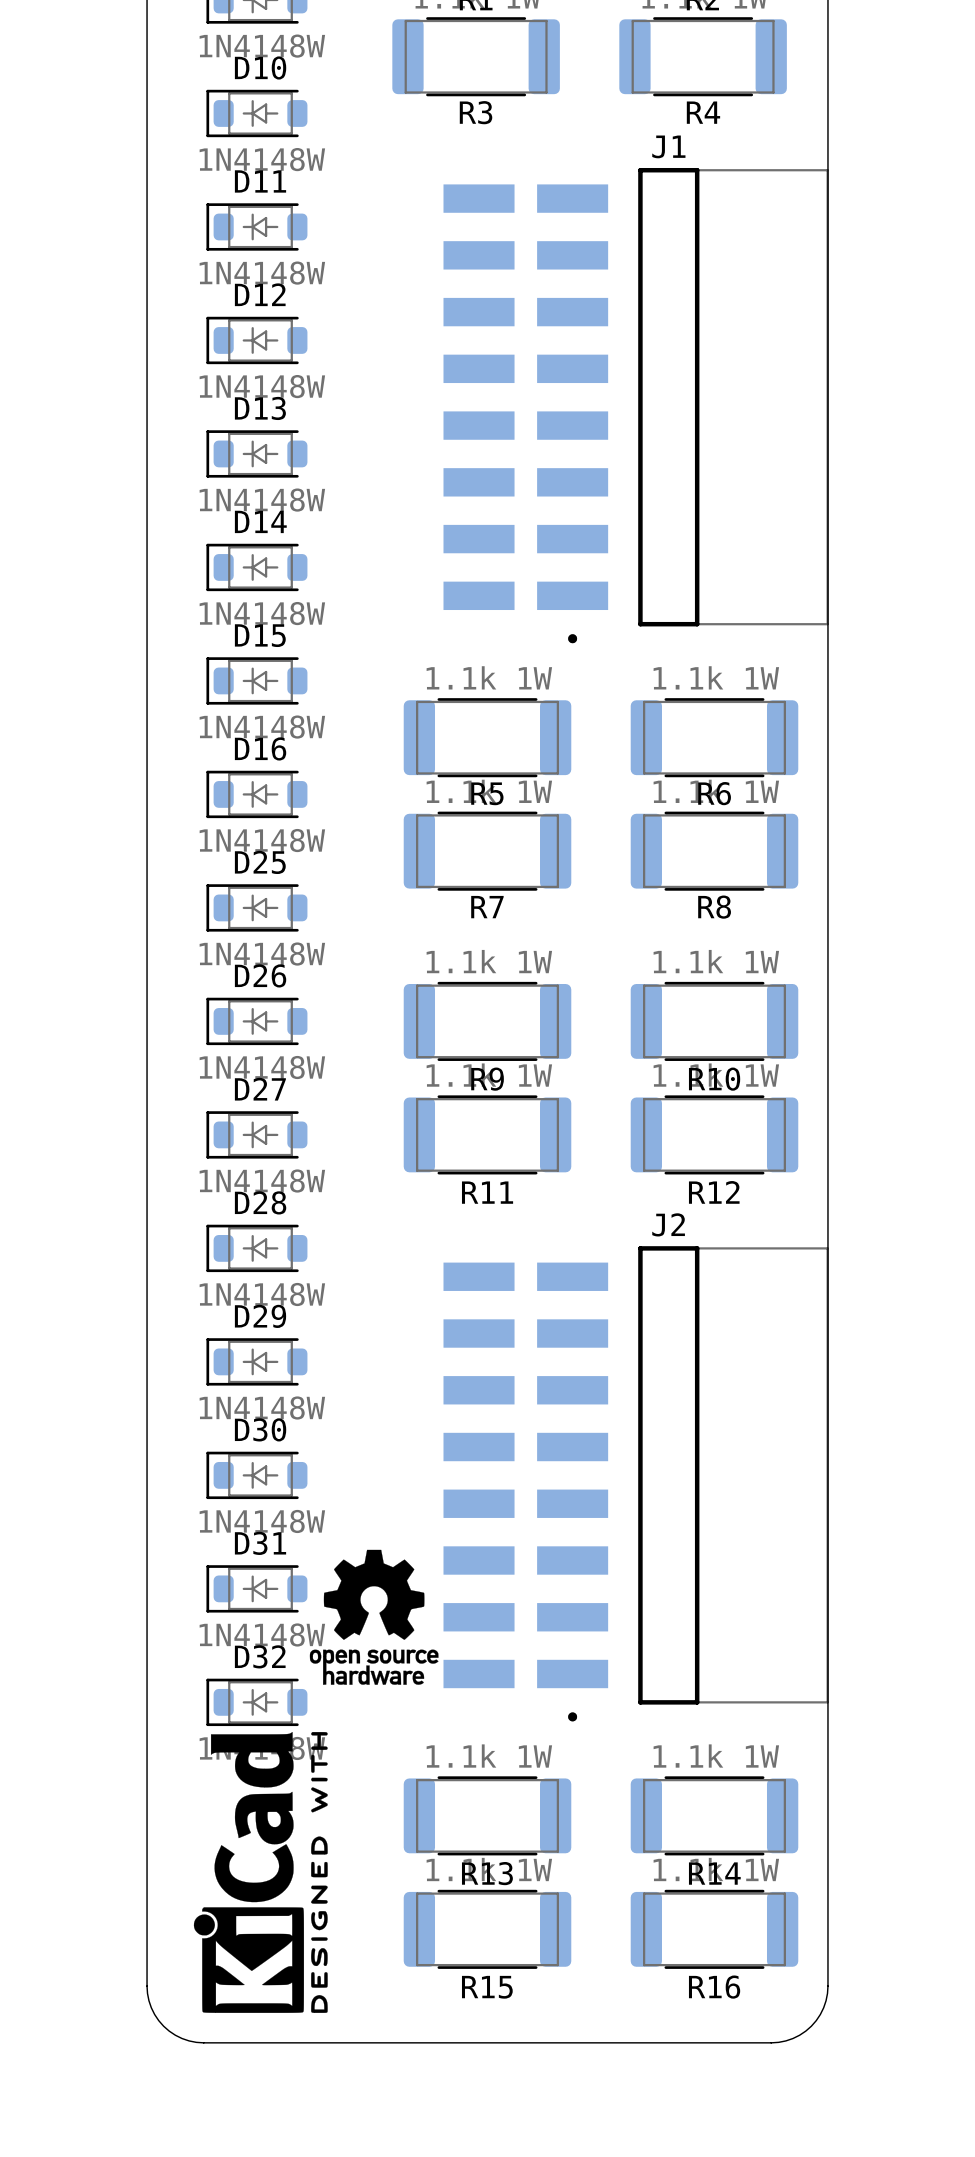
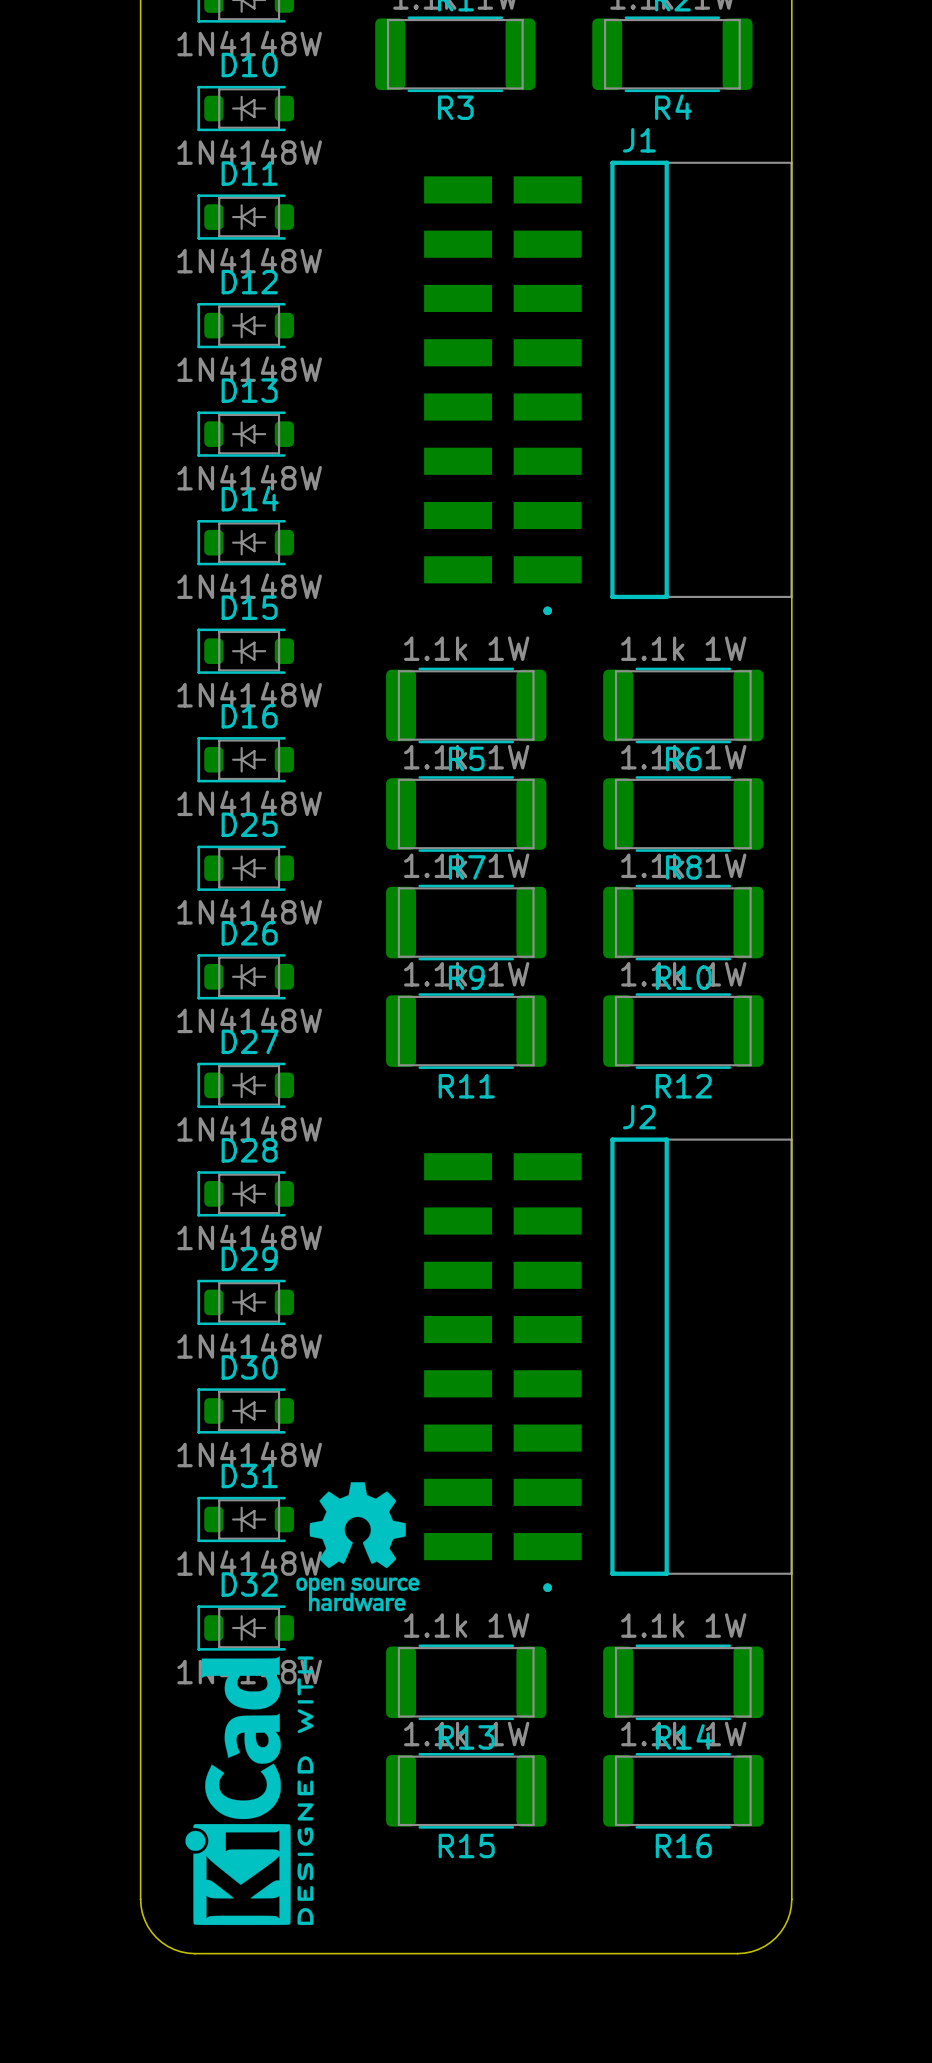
R9 position: (487, 1021) -> (466, 922)
R10 position: (714, 1021) -> (683, 922)
R11 position: (487, 1134) -> (466, 1031)
R12 position: (714, 1134) -> (683, 1031)
J2 position: (636, 1483) -> (608, 1364)
R13 position: (487, 1815) -> (466, 1682)
R14 position: (714, 1815) -> (683, 1682)
R15 position: (487, 1929) -> (466, 1790)
R16 position: (714, 1929) -> (683, 1790)

